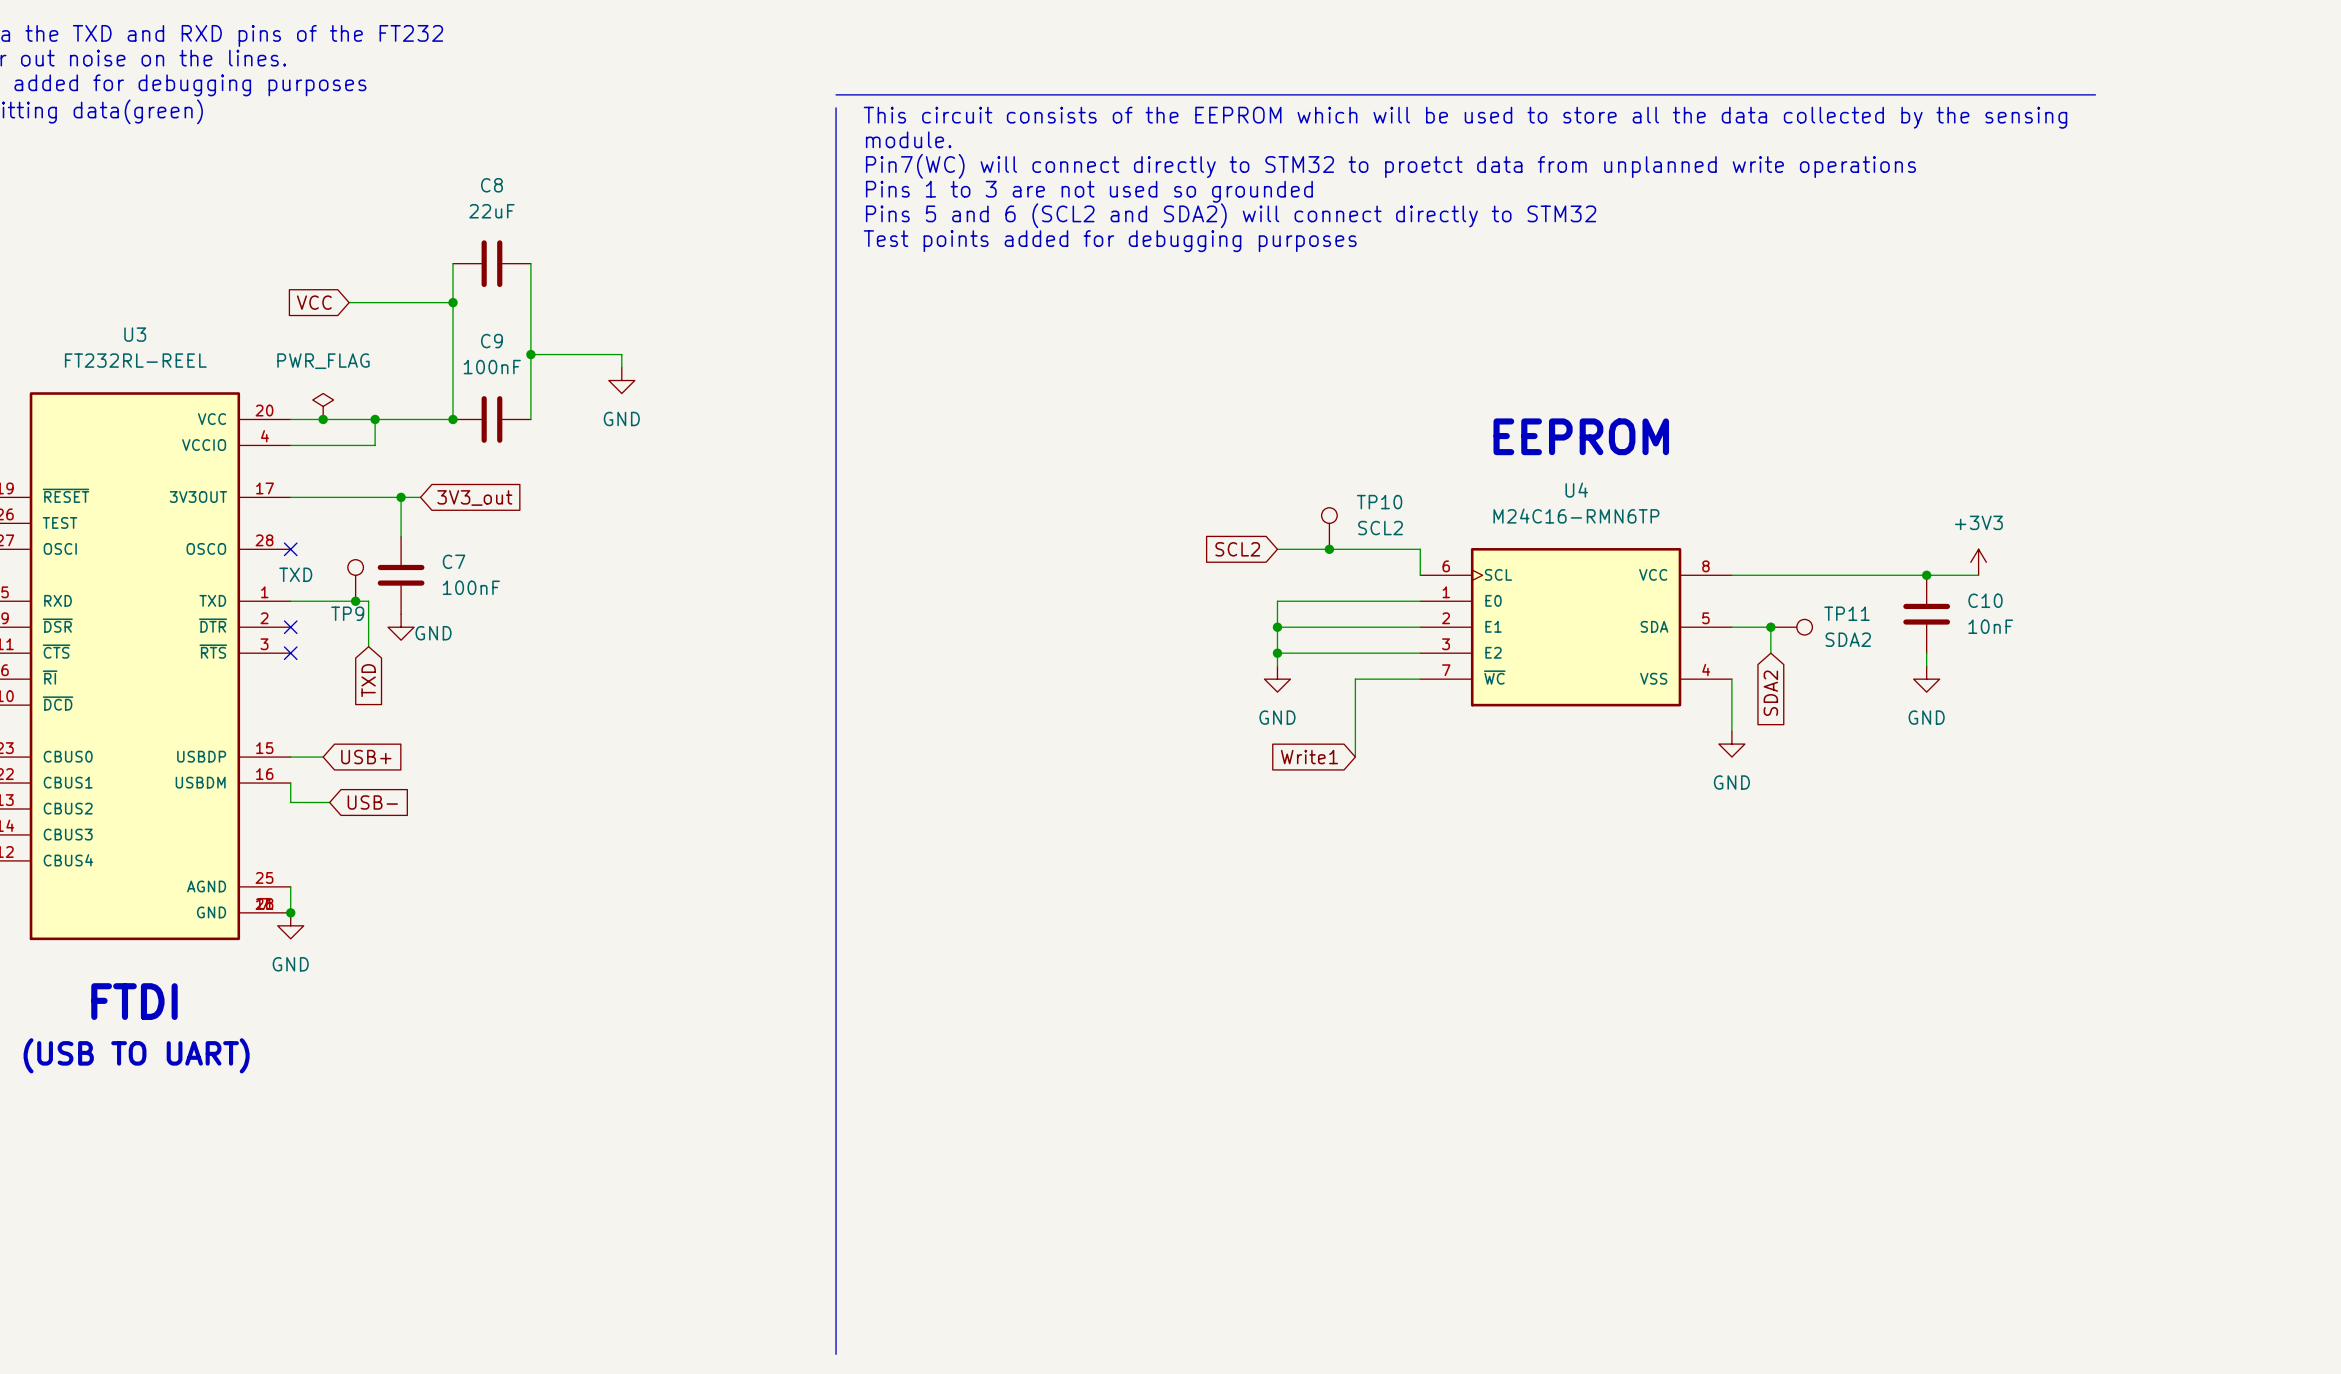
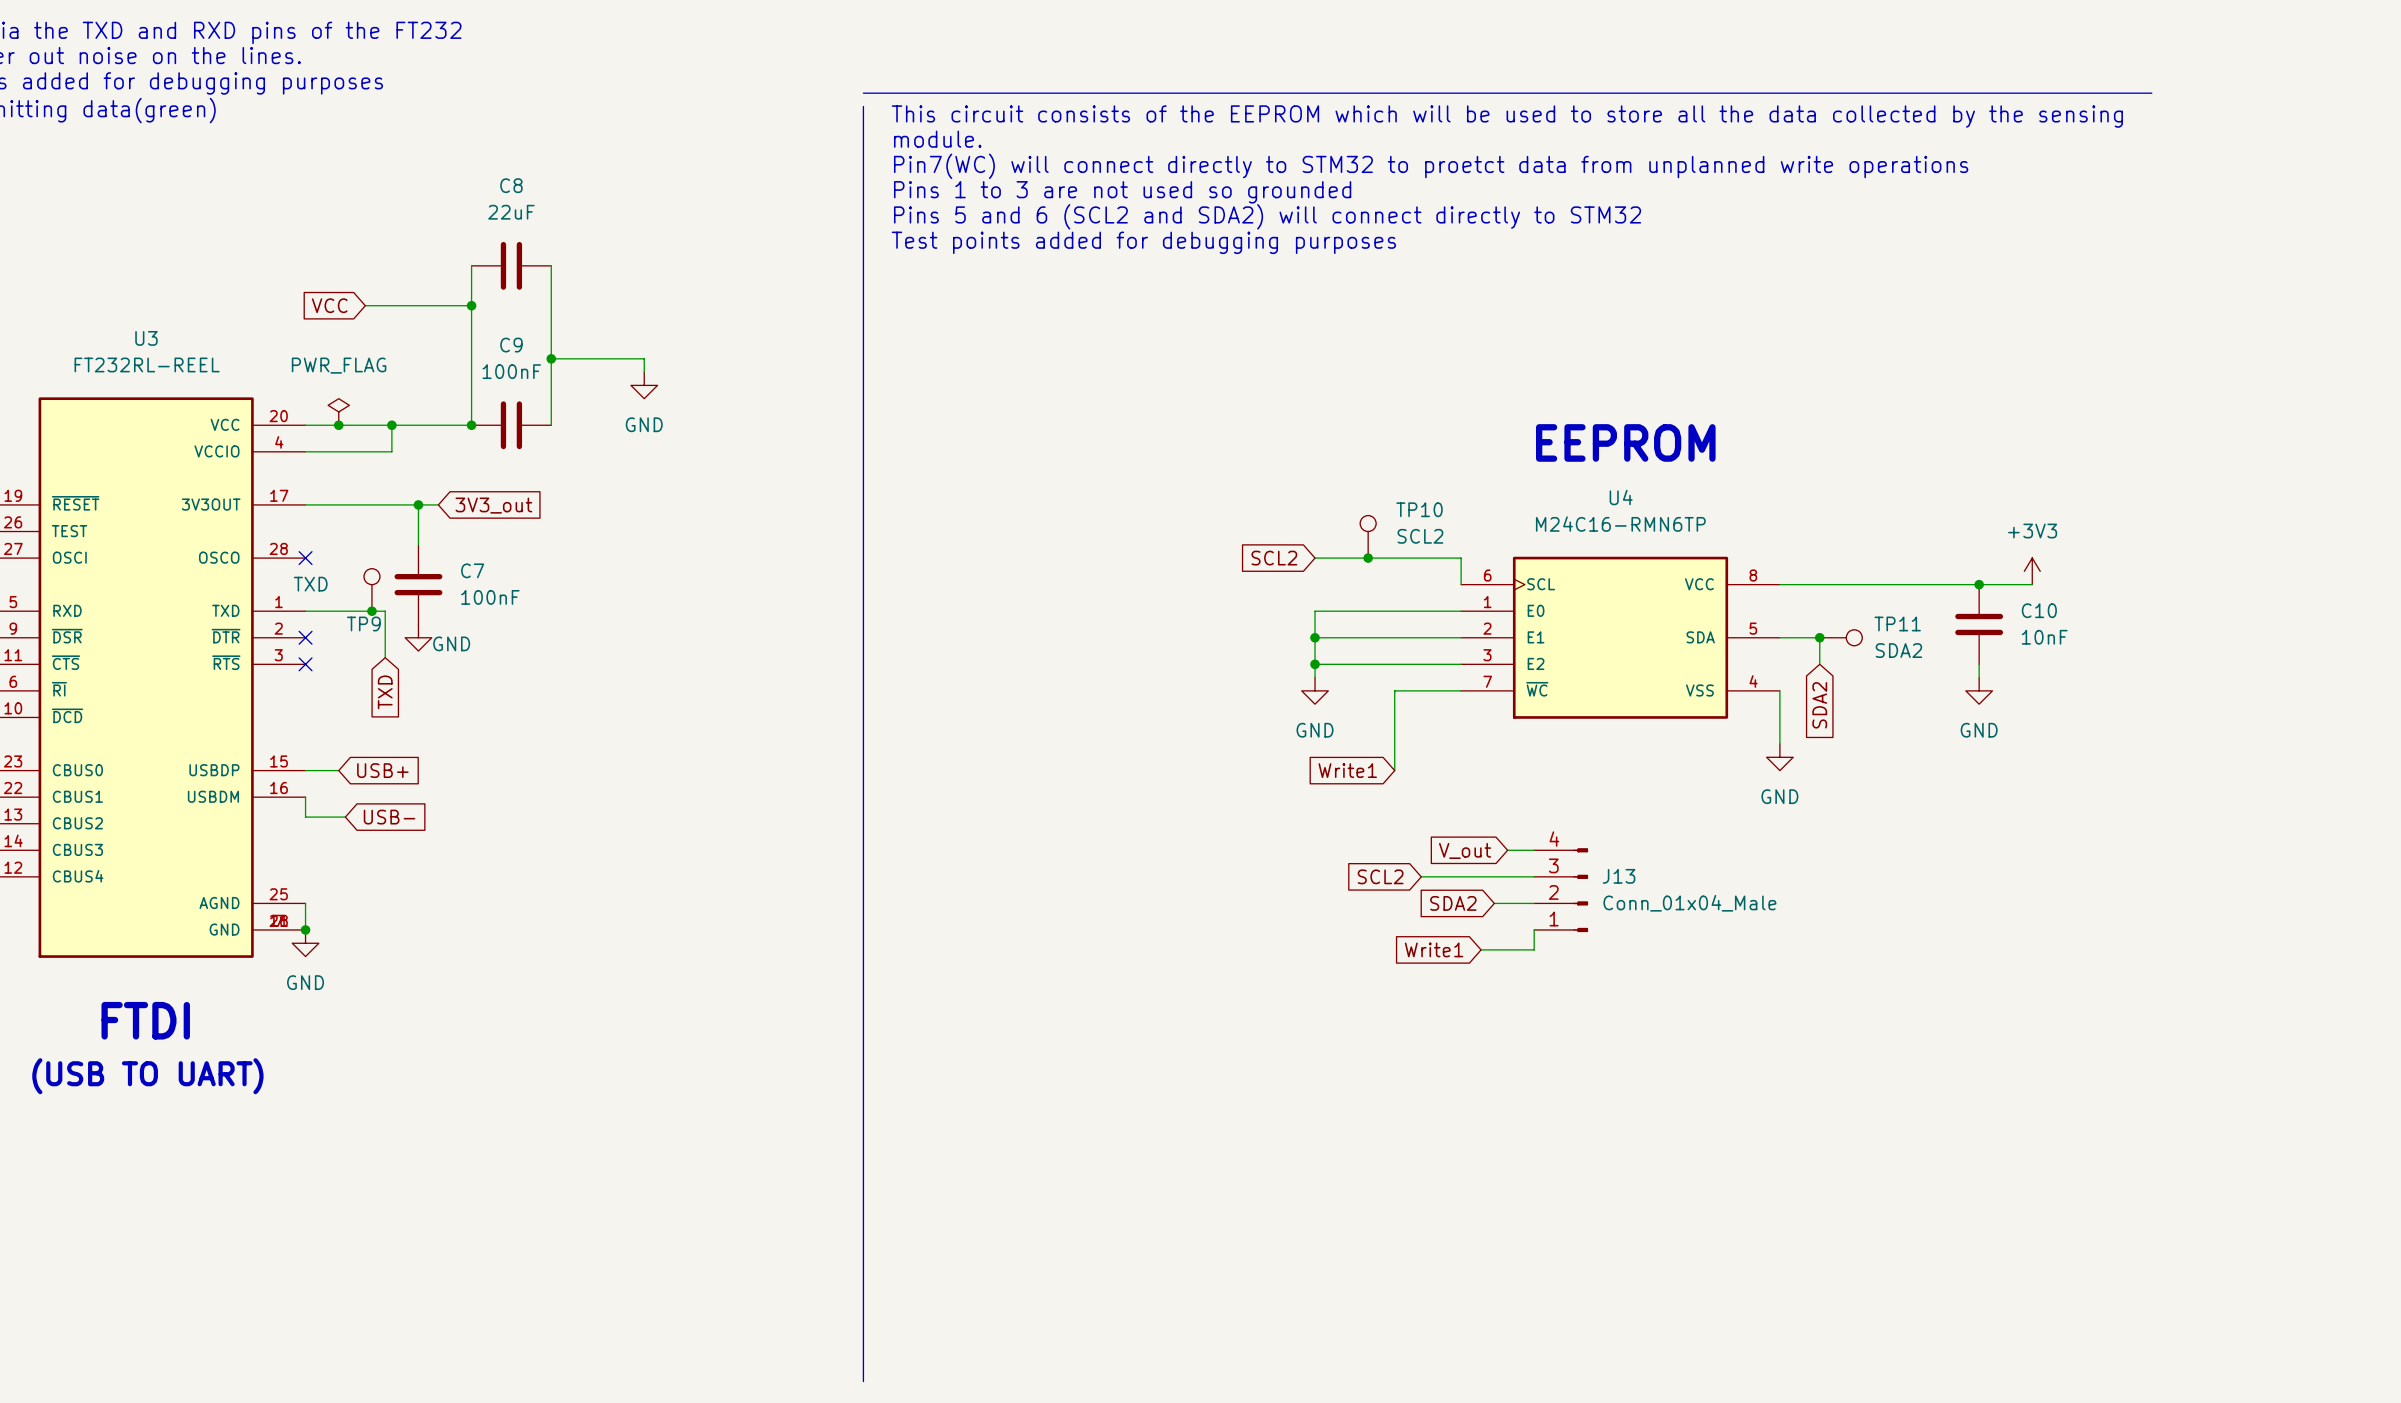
wire: none -> (1507, 850) (1534, 850)
global label: none -> V_out (1465, 850)
global label: none -> SCL2 (1380, 876)
wire: none -> (1421, 876) (1534, 876)
J13: none -> Conn_01x04_Male (1561, 890)
global label: none -> SDA2 (1453, 903)
wire: none -> (1494, 903) (1534, 903)
wire: none -> (1534, 929) (1534, 949) (1481, 949)
global label: none -> Write1 (1434, 949)

